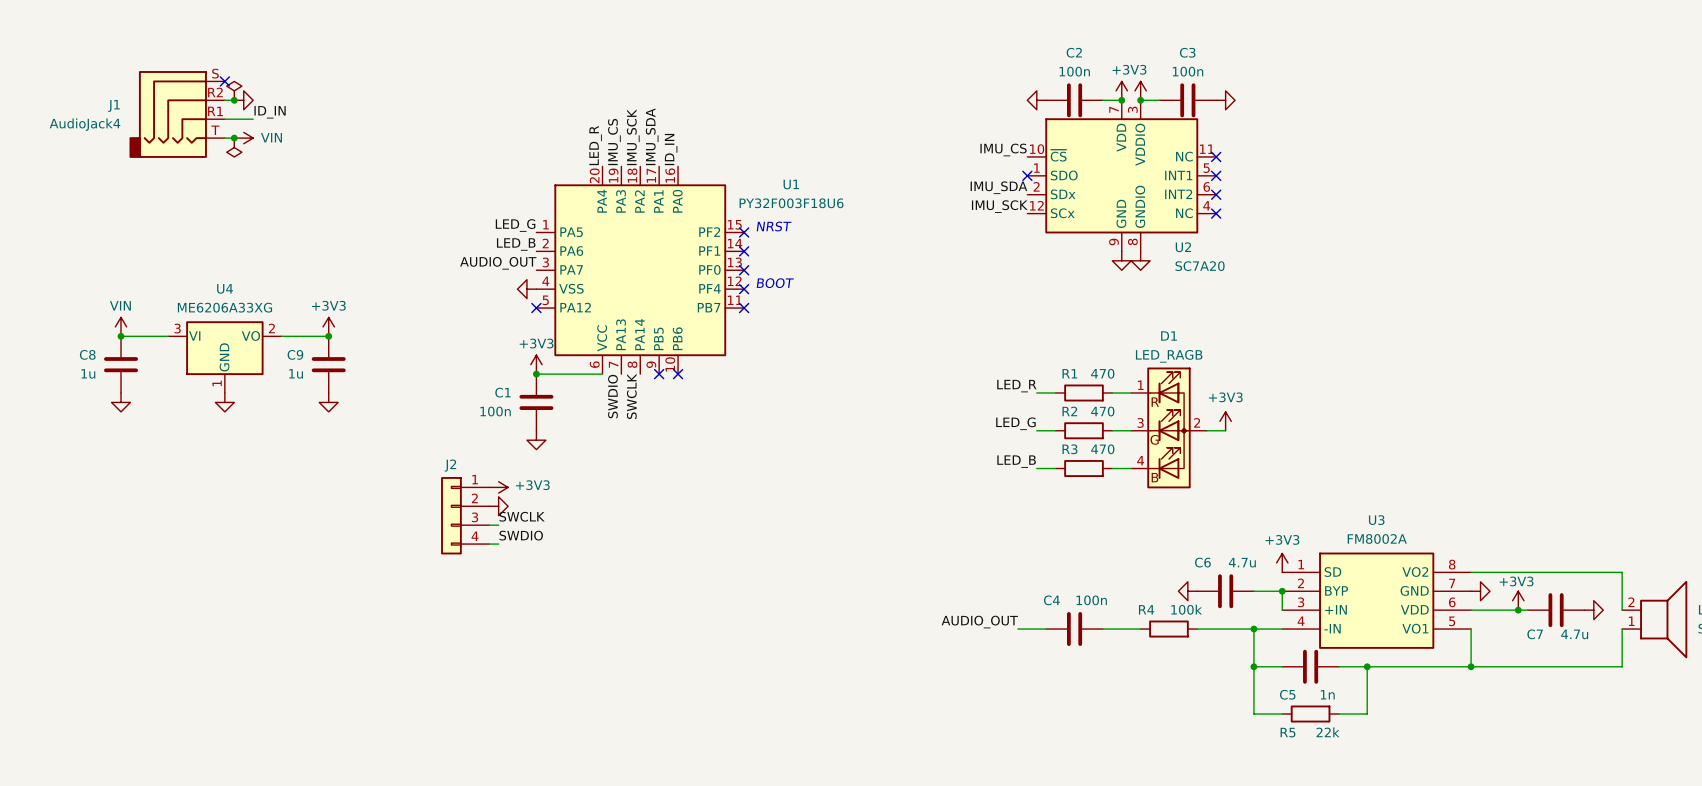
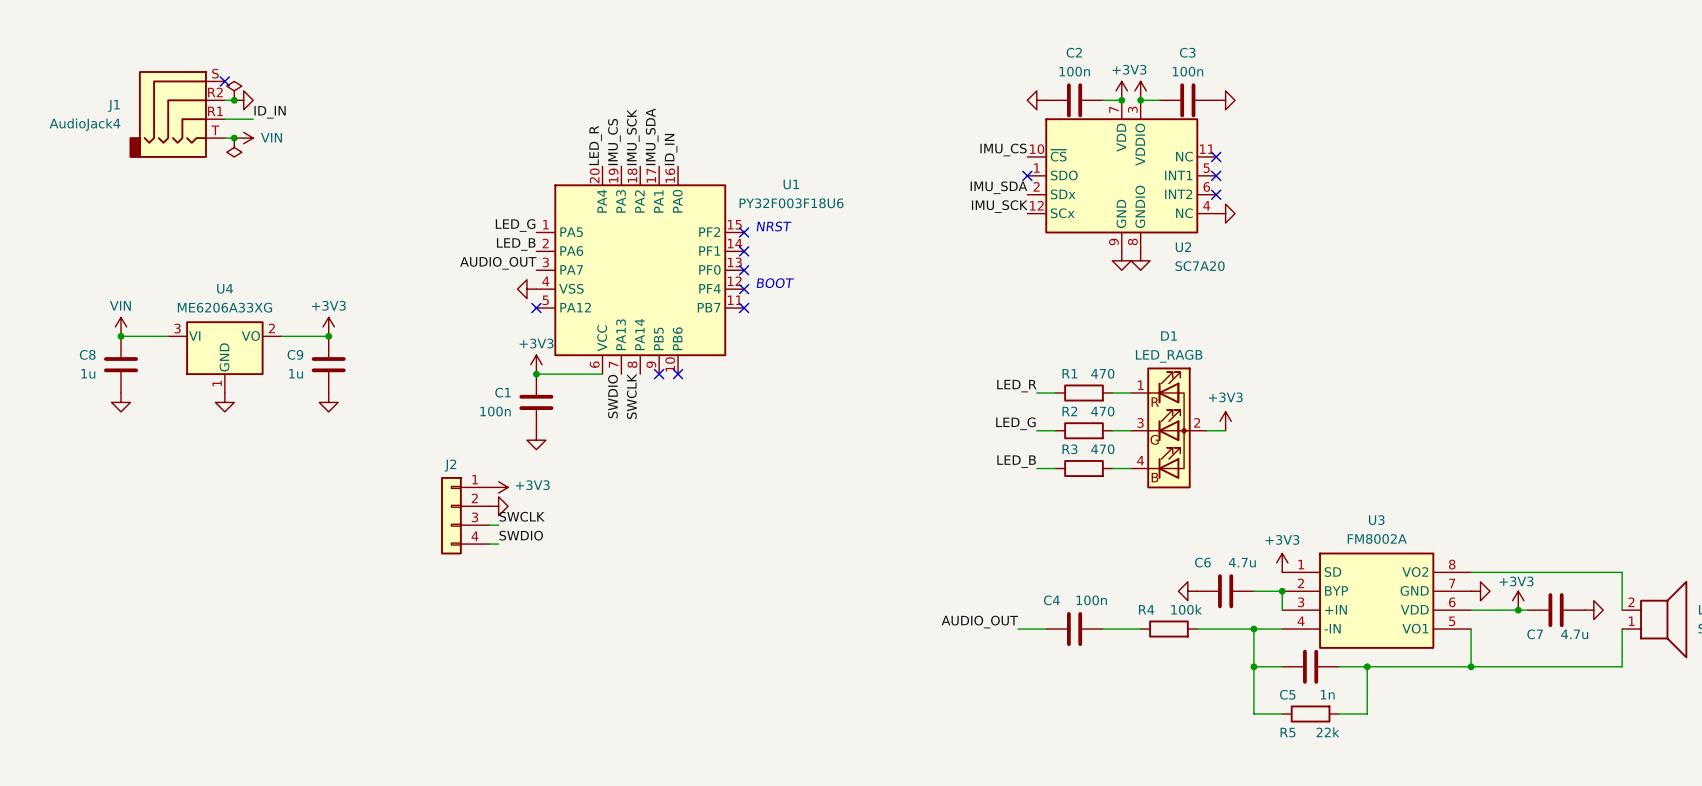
no-connect mark: (1216, 213) -> none
power symbol: none -> (1225, 213)

